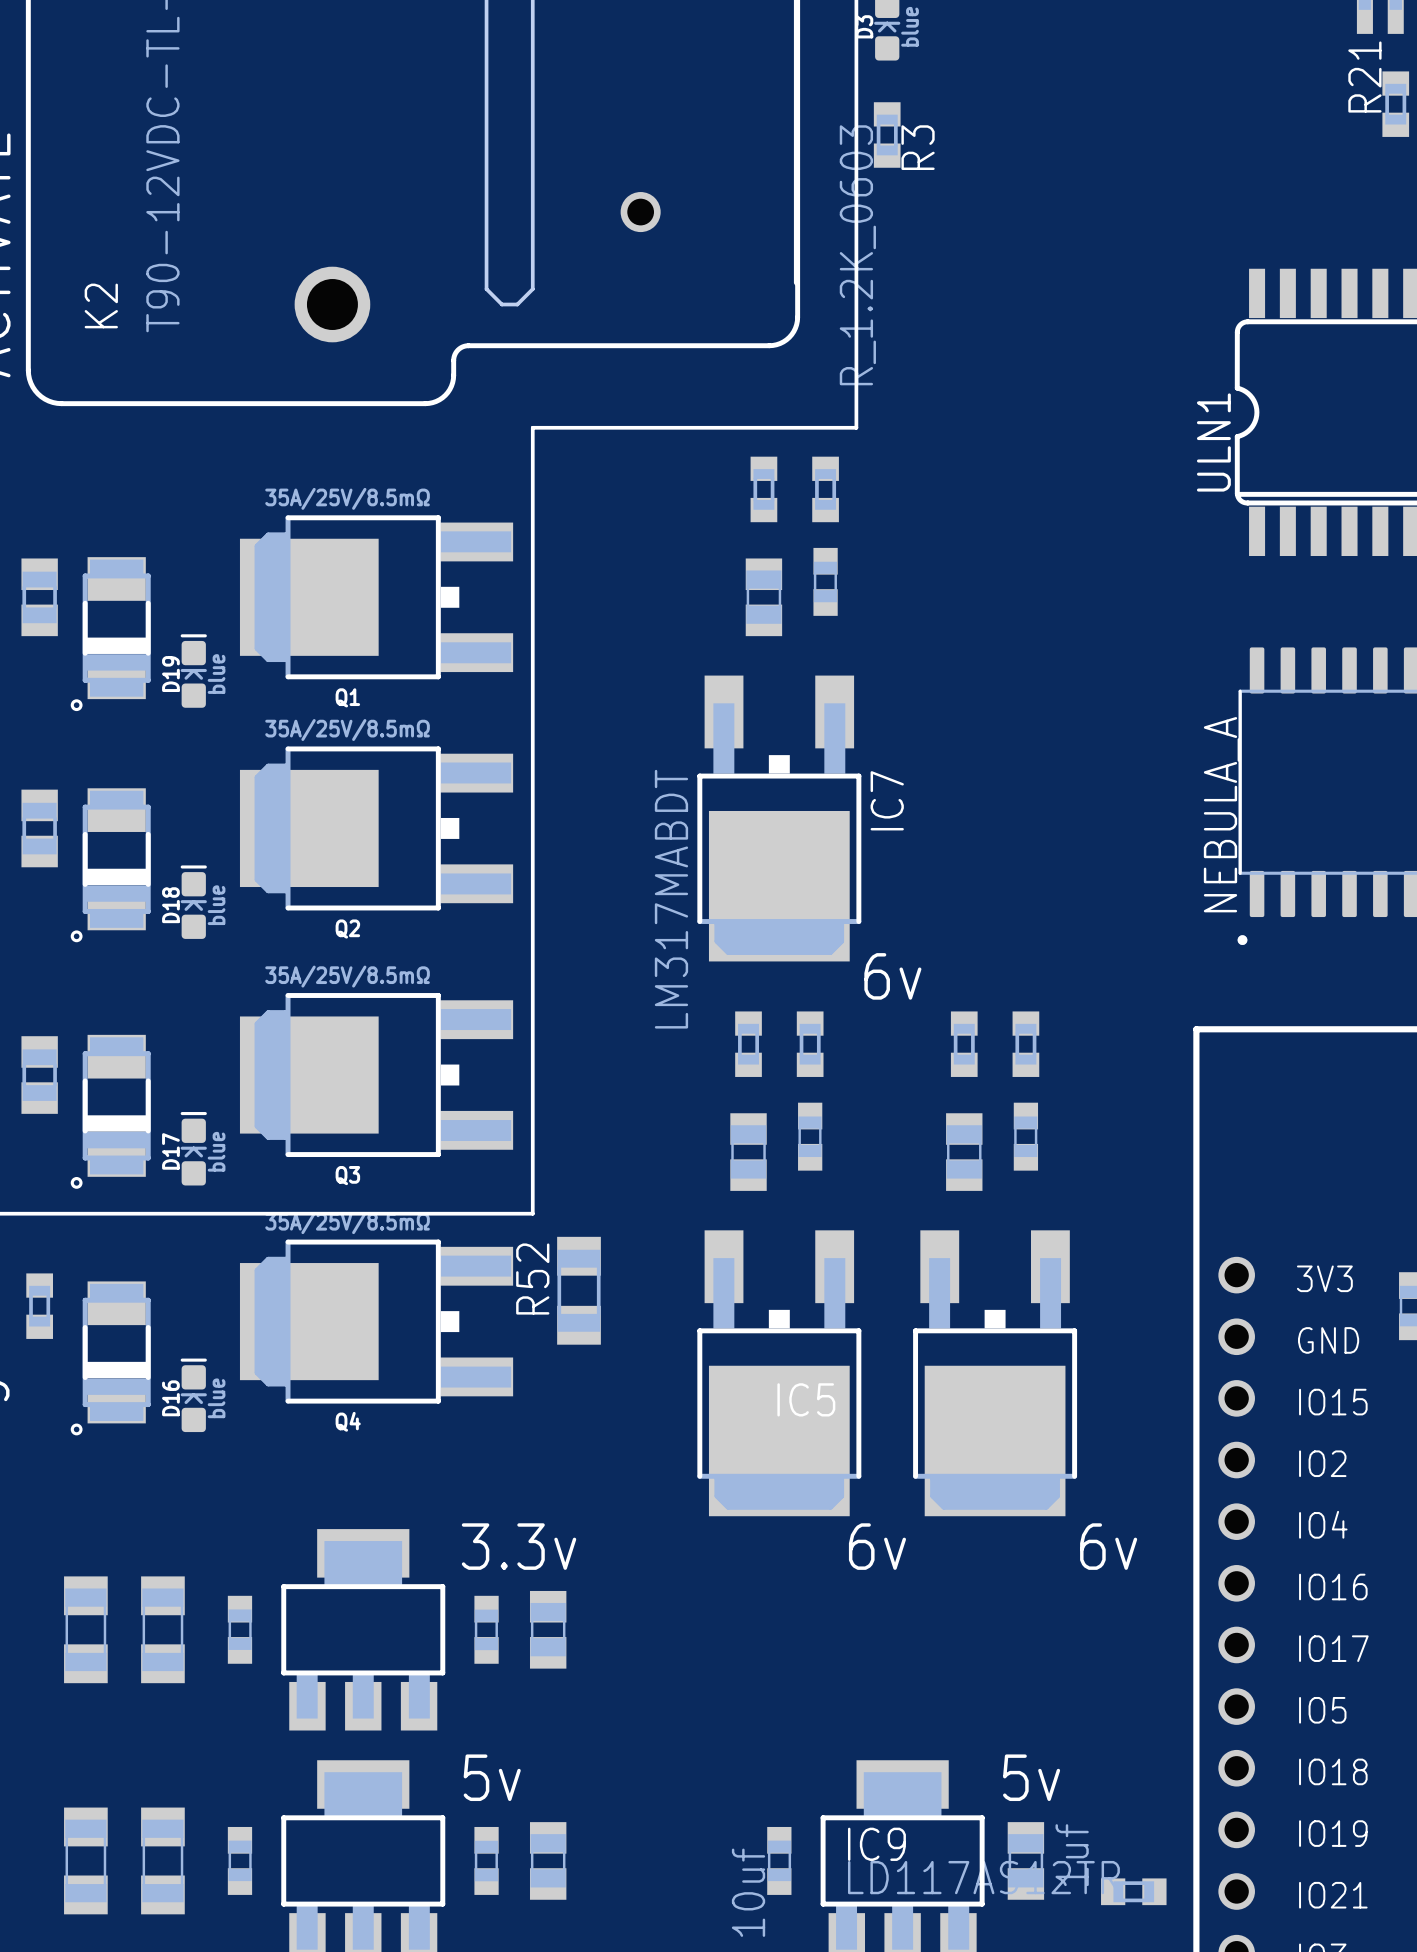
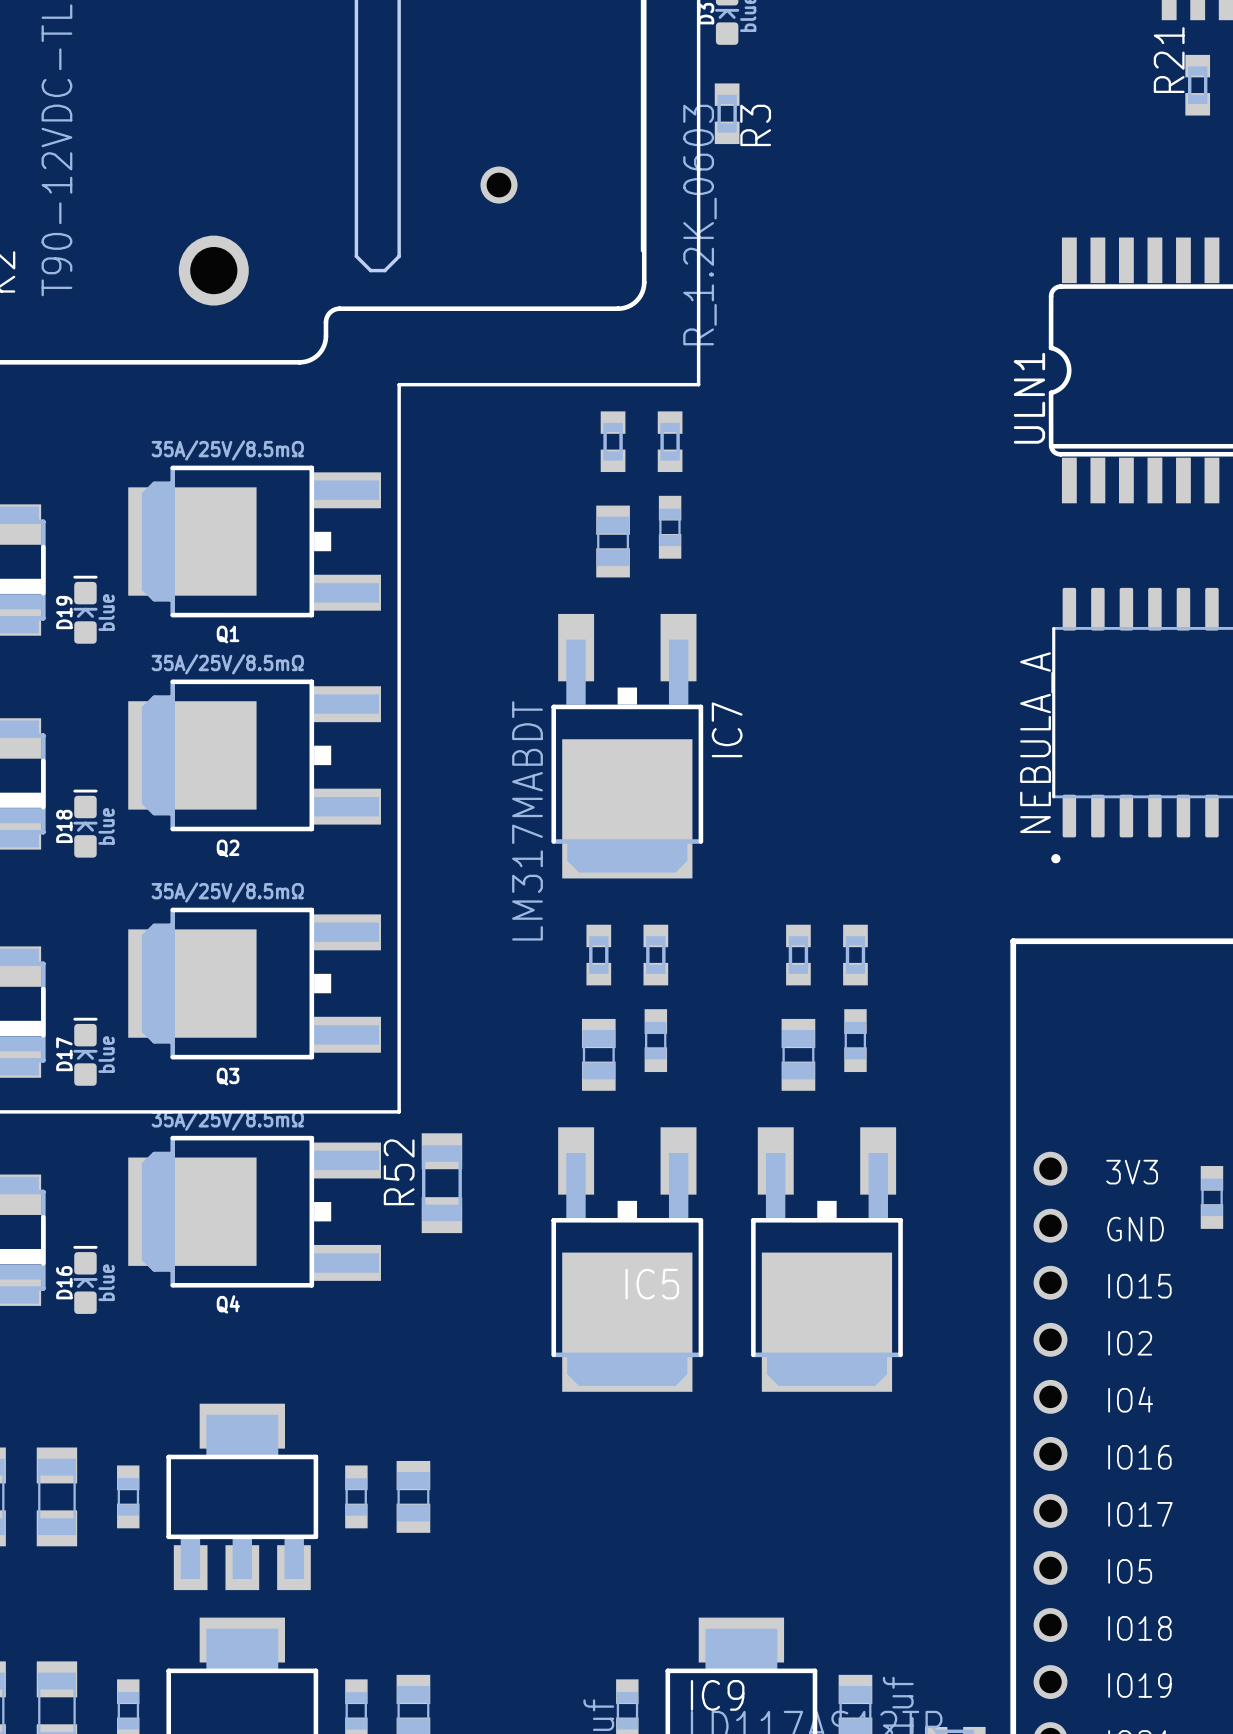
text: 6v (892, 976) -> none
text: 3.3v (519, 1546) -> none
text: 6v (877, 1546) -> none
text: 6v (1108, 1546) -> none
text: 5v (492, 1777) -> none
text: 5v (1031, 1777) -> none

